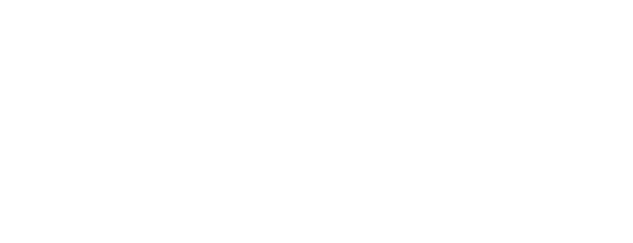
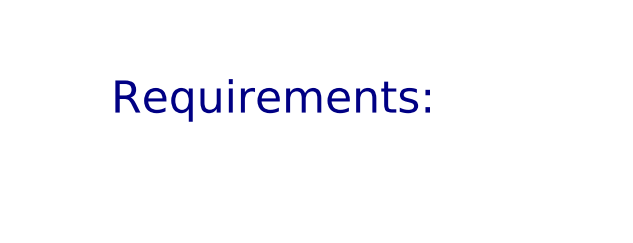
text: none -> Requirements: (272, 100)

